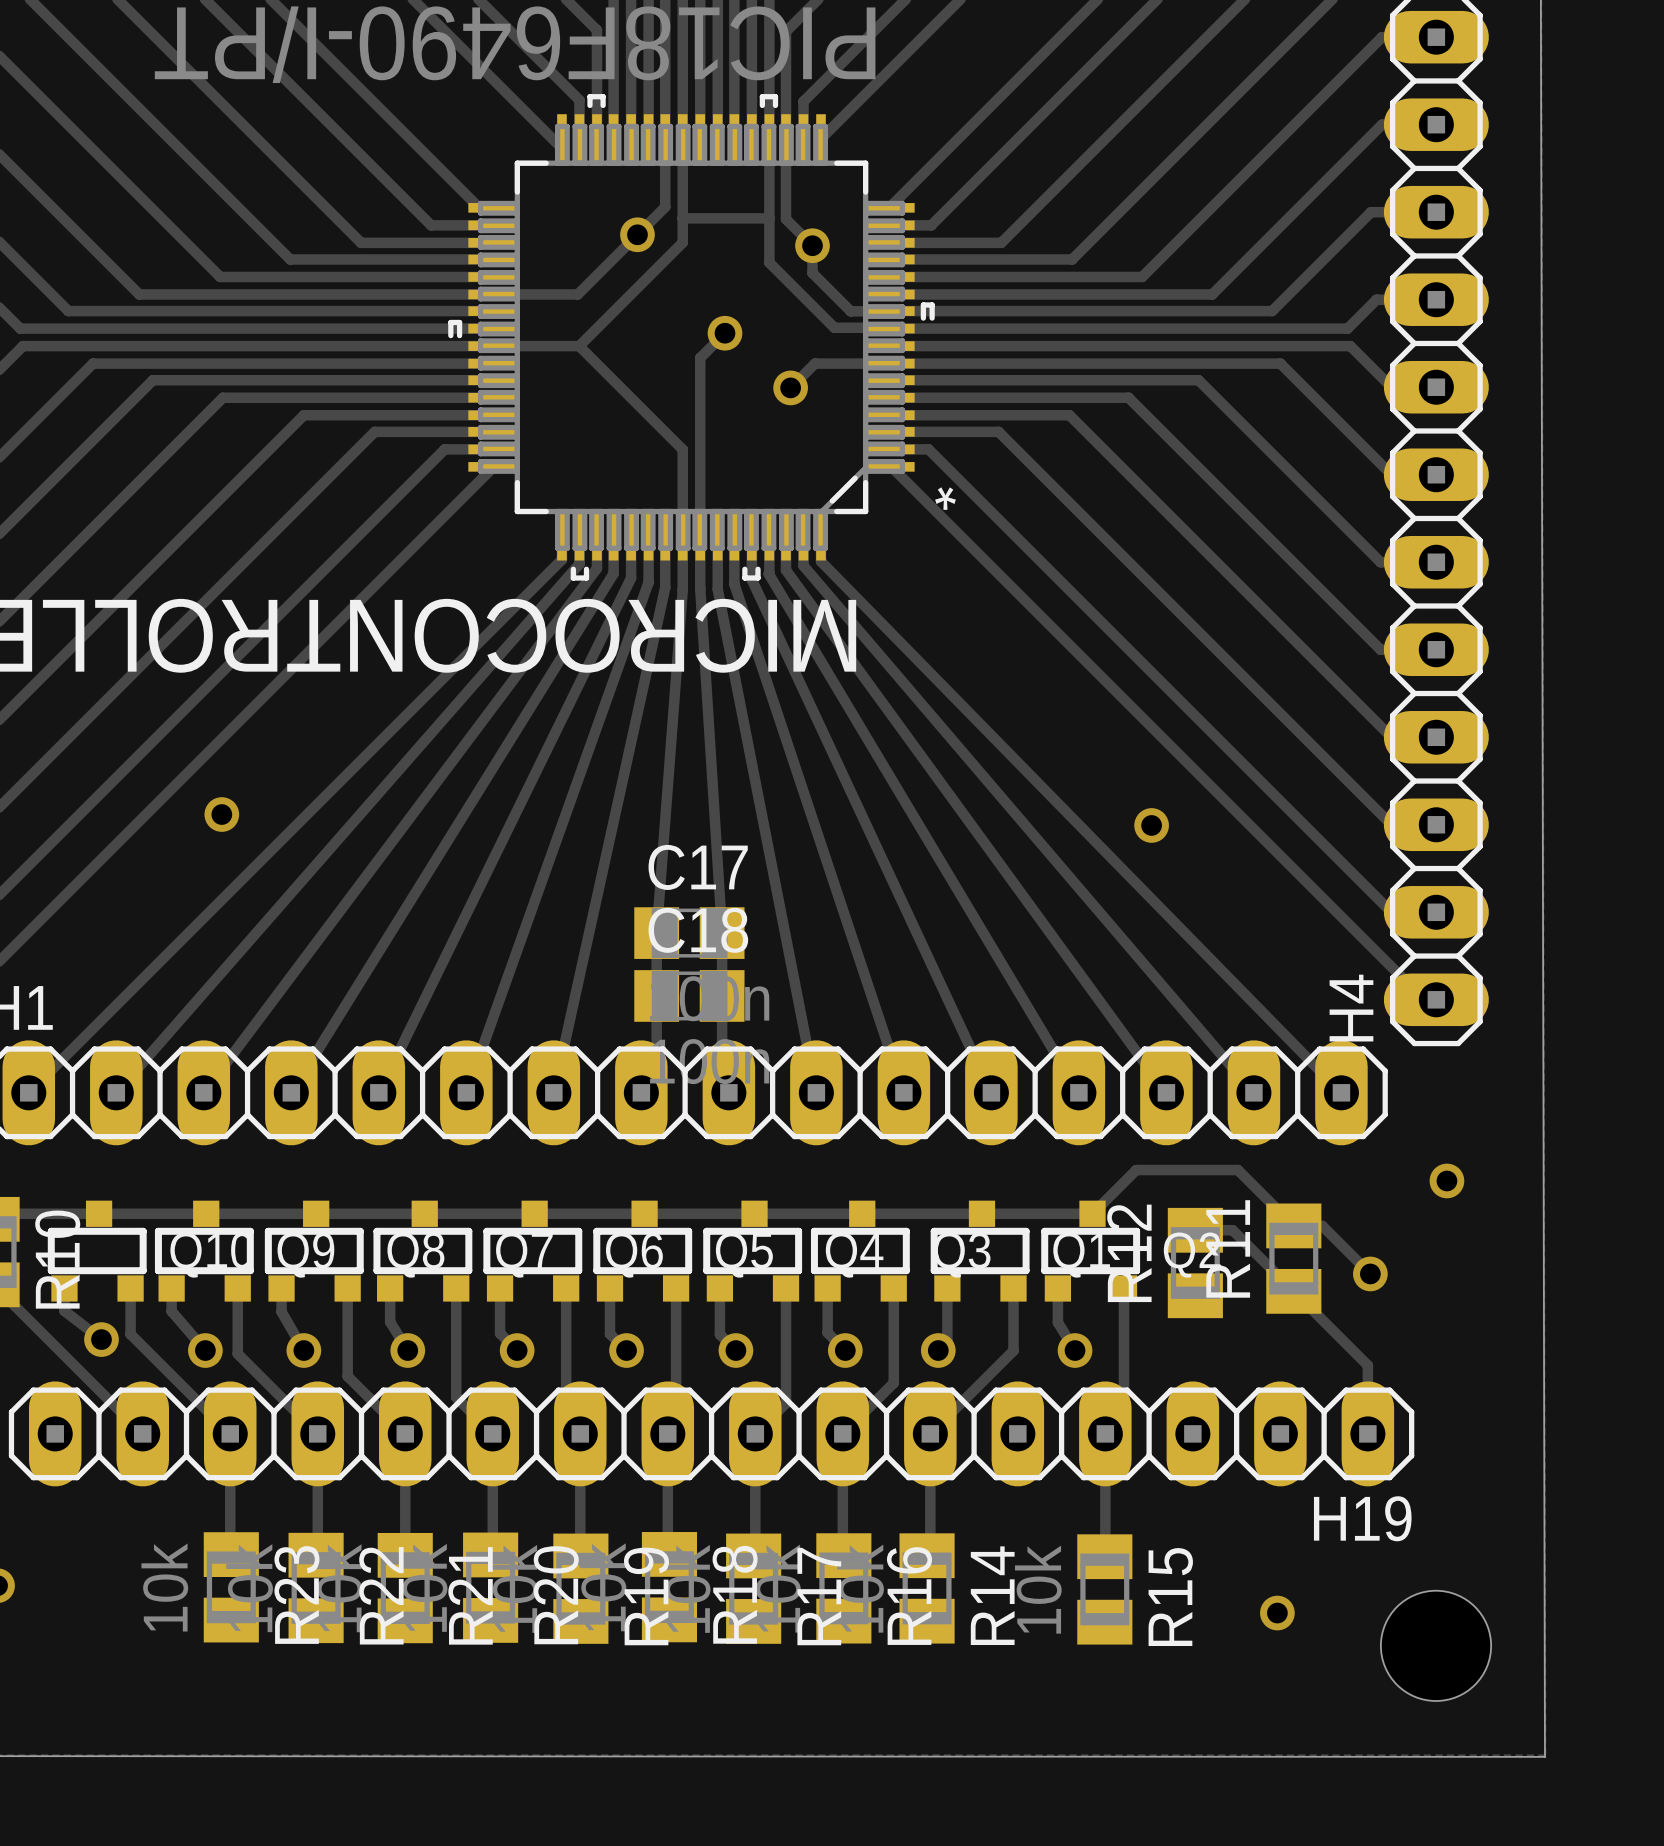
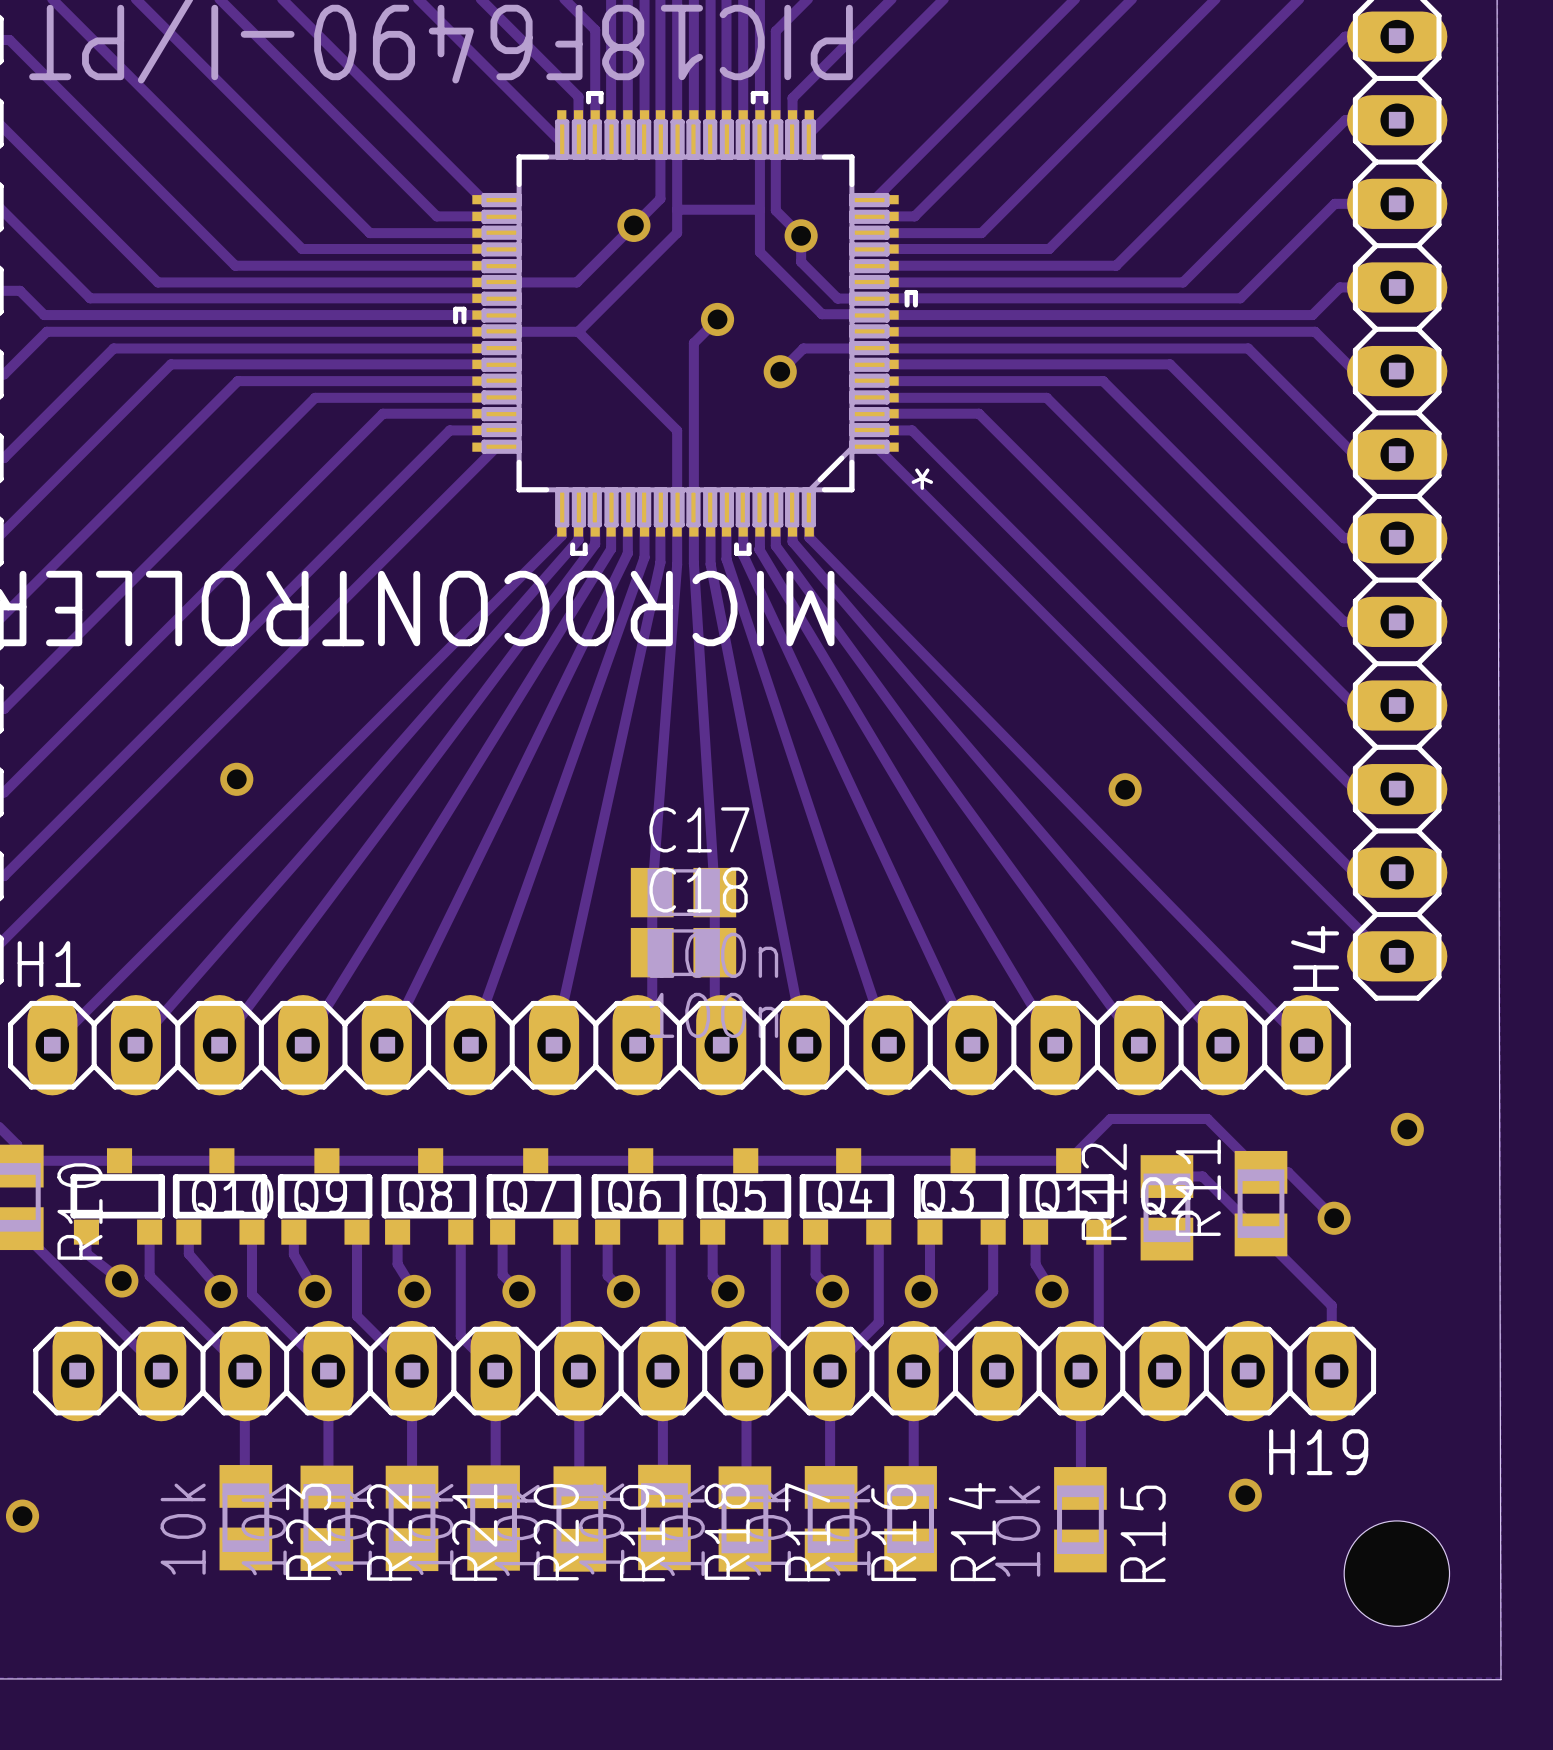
via position: (1277, 1613) -> (1245, 1495)

